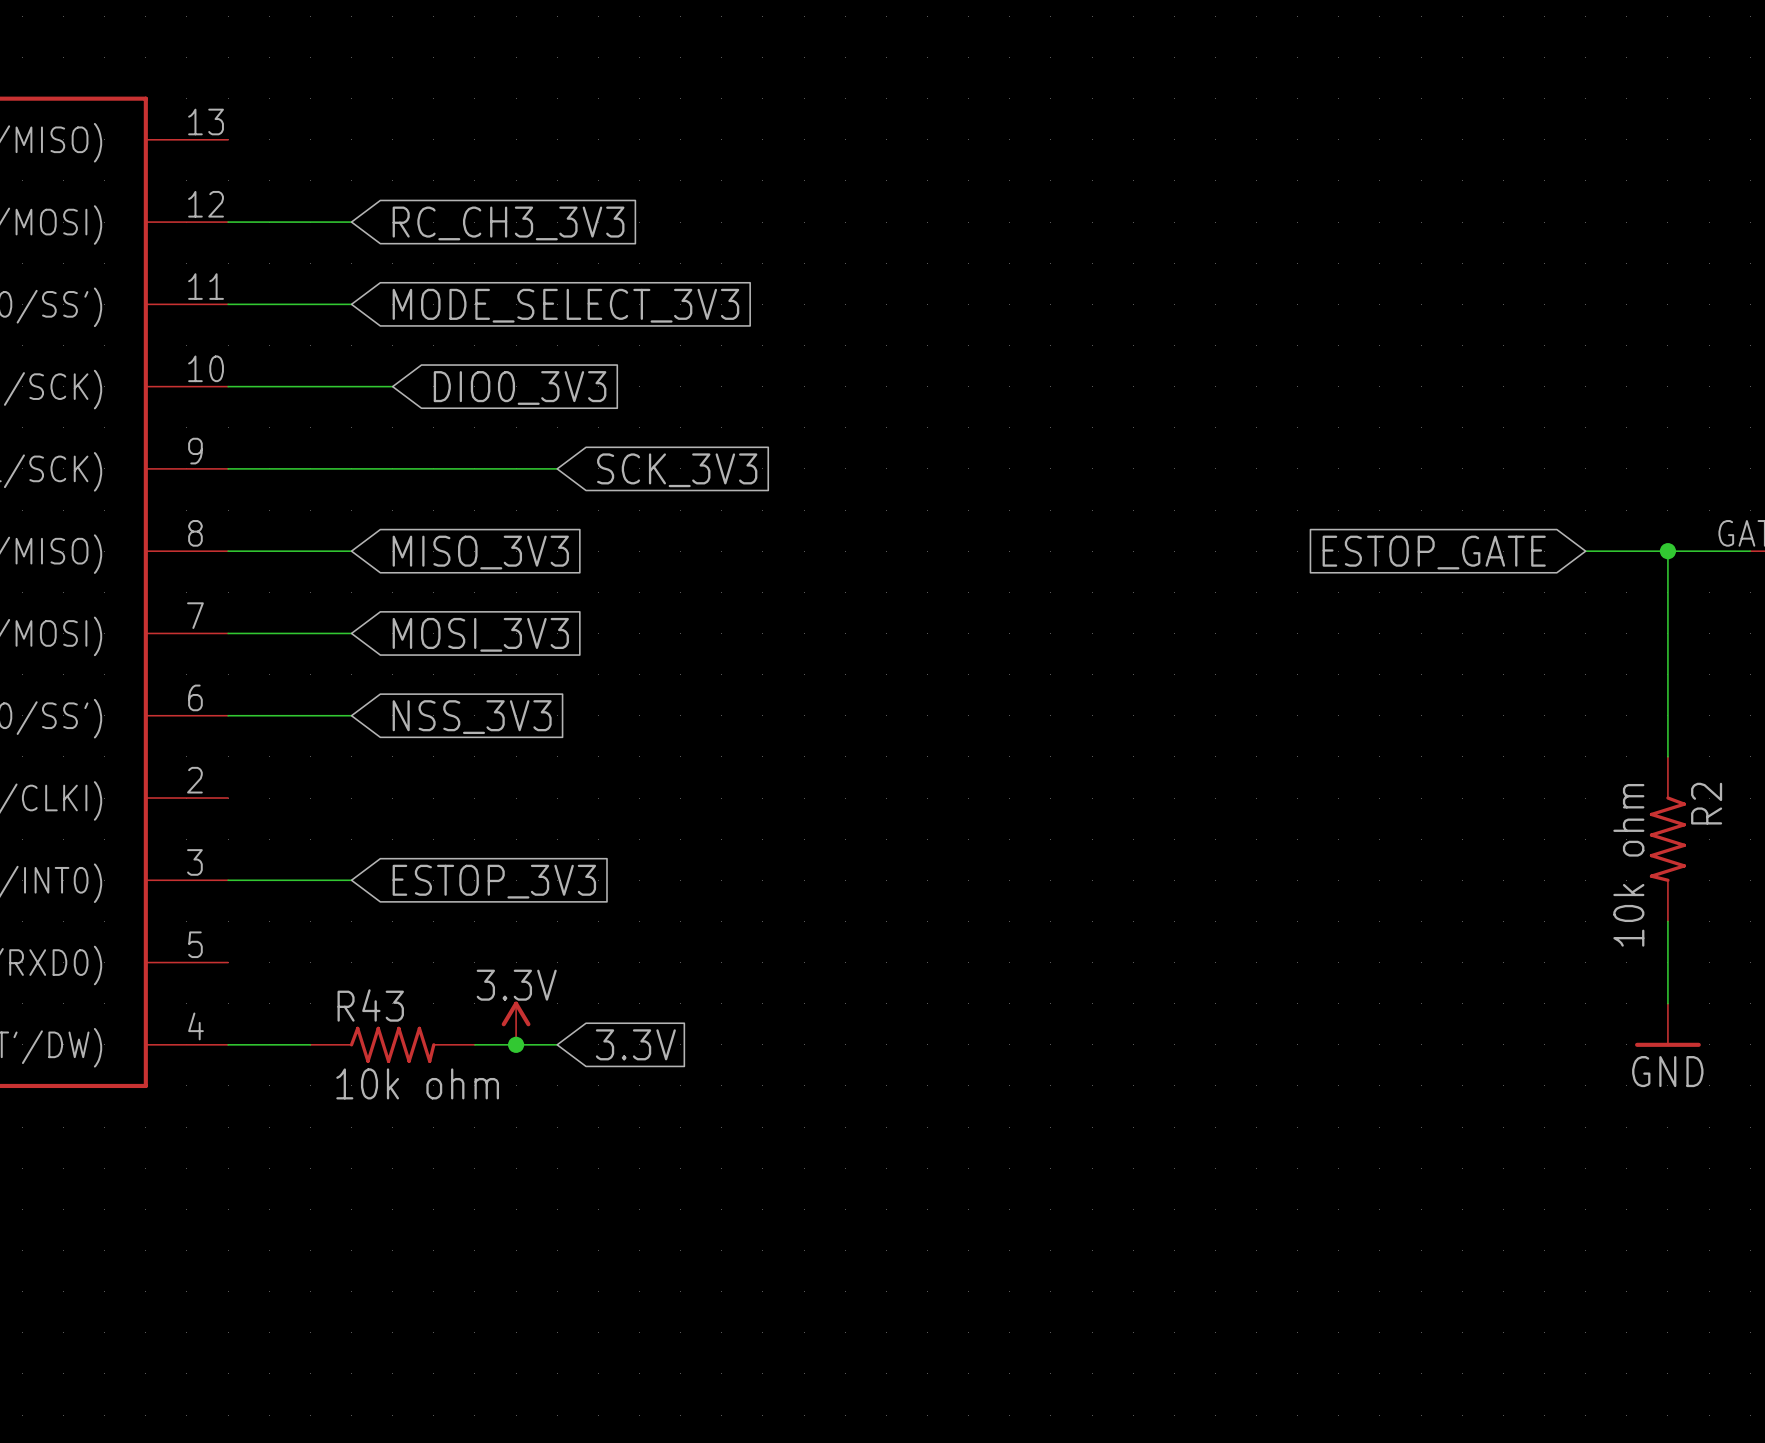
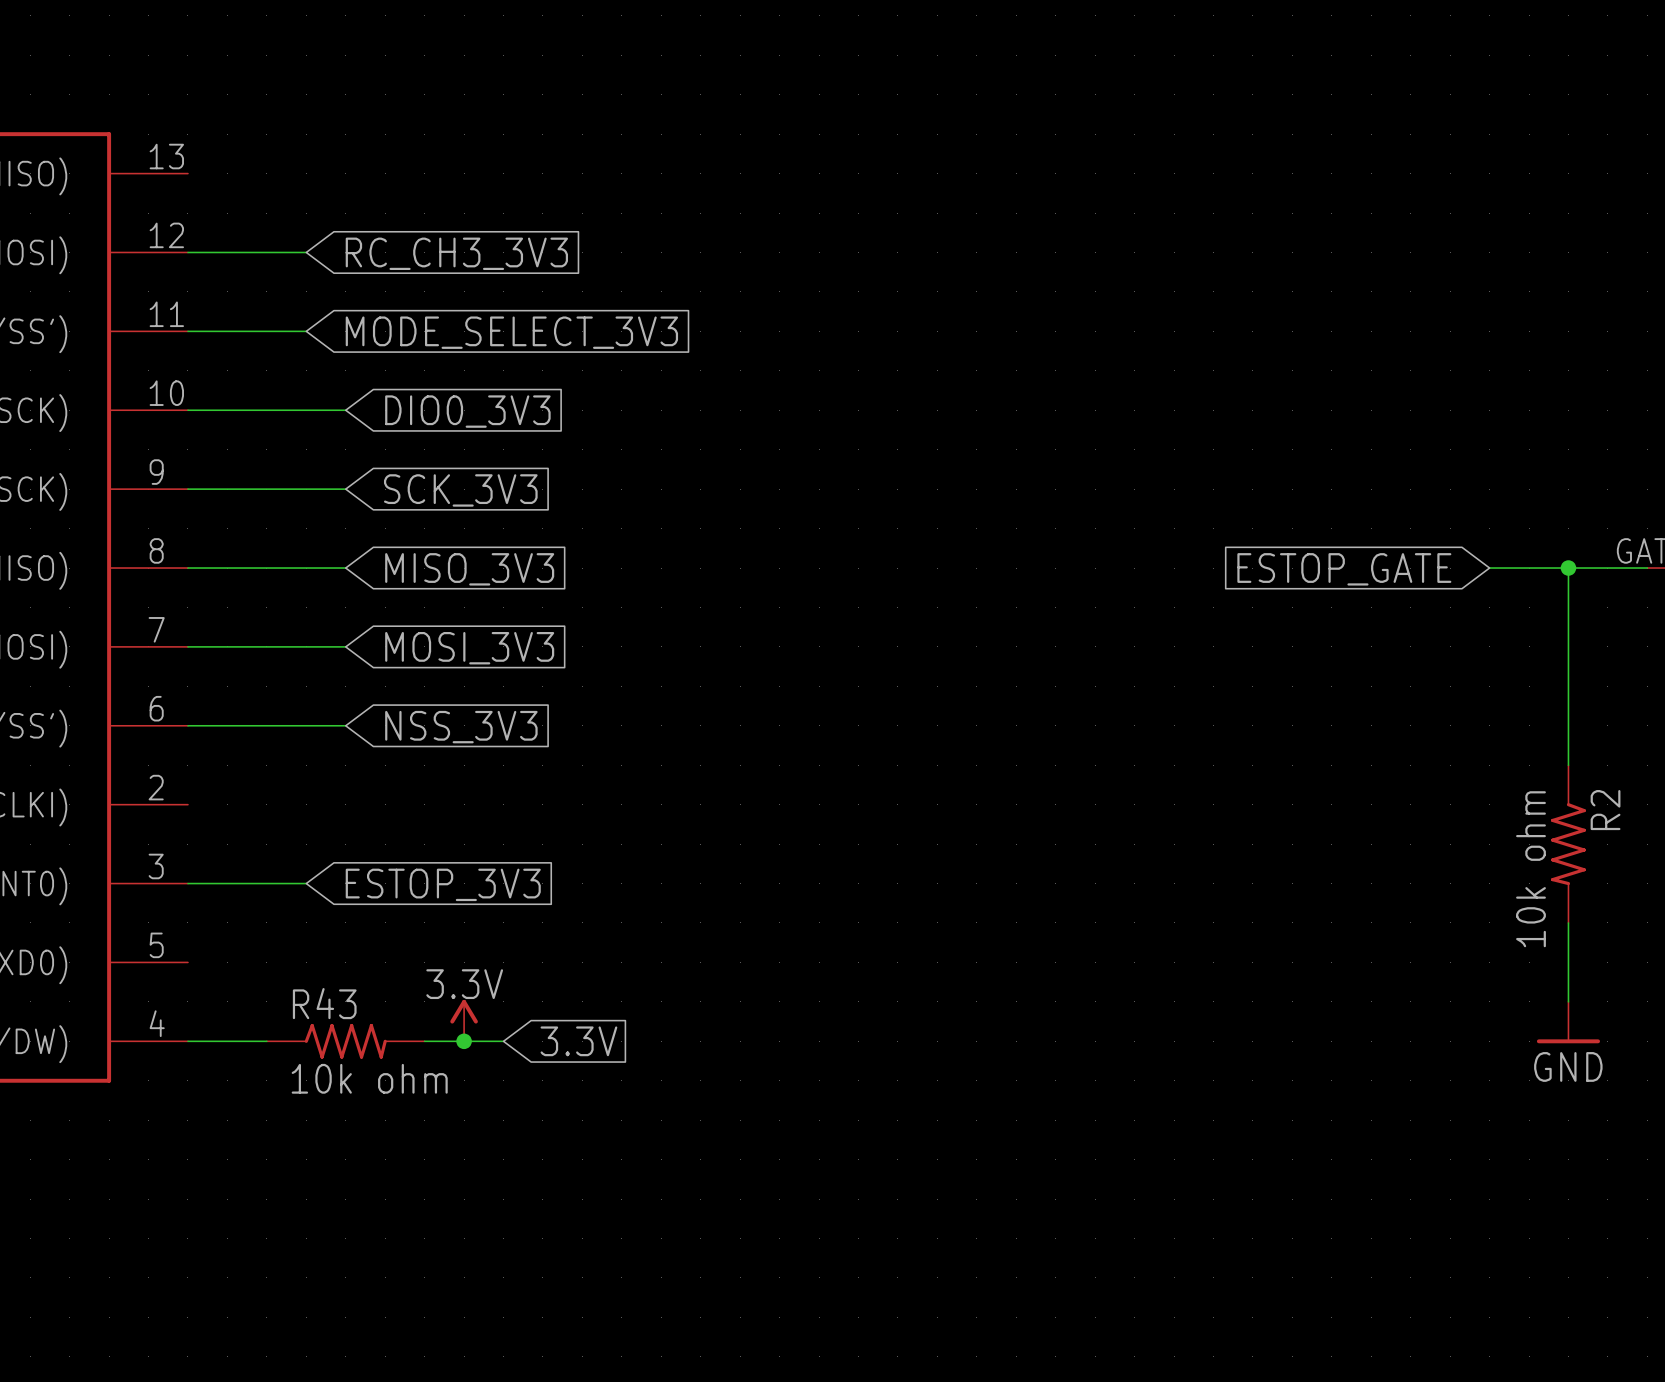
wire: (392, 468) (557, 468) -> none
global label position: SCK_3V3 (677, 470) -> SCK_3V3 (460, 490)
wire: none -> (306, 568) (345, 568)
global label position: MISO_3V3 (480, 552) -> MISO_3V3 (469, 569)
wire: none -> (306, 646) (345, 646)
global label position: MOSI_3V3 (480, 634) -> MOSI_3V3 (469, 648)
wire: none -> (306, 725) (345, 725)
global label position: NSS_3V3 (472, 717) -> NSS_3V3 (461, 727)

